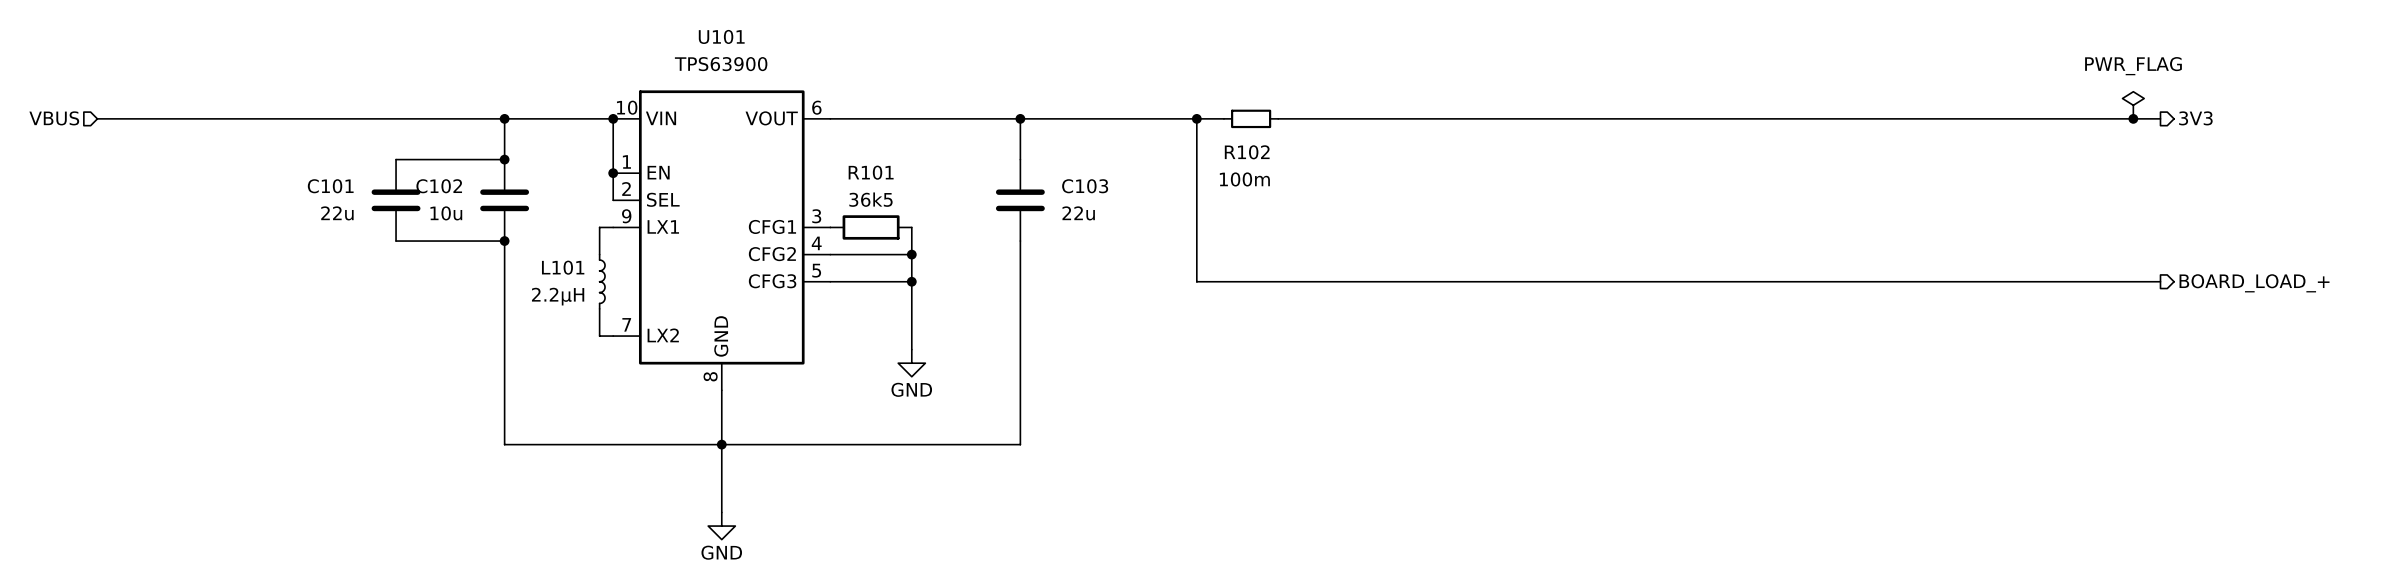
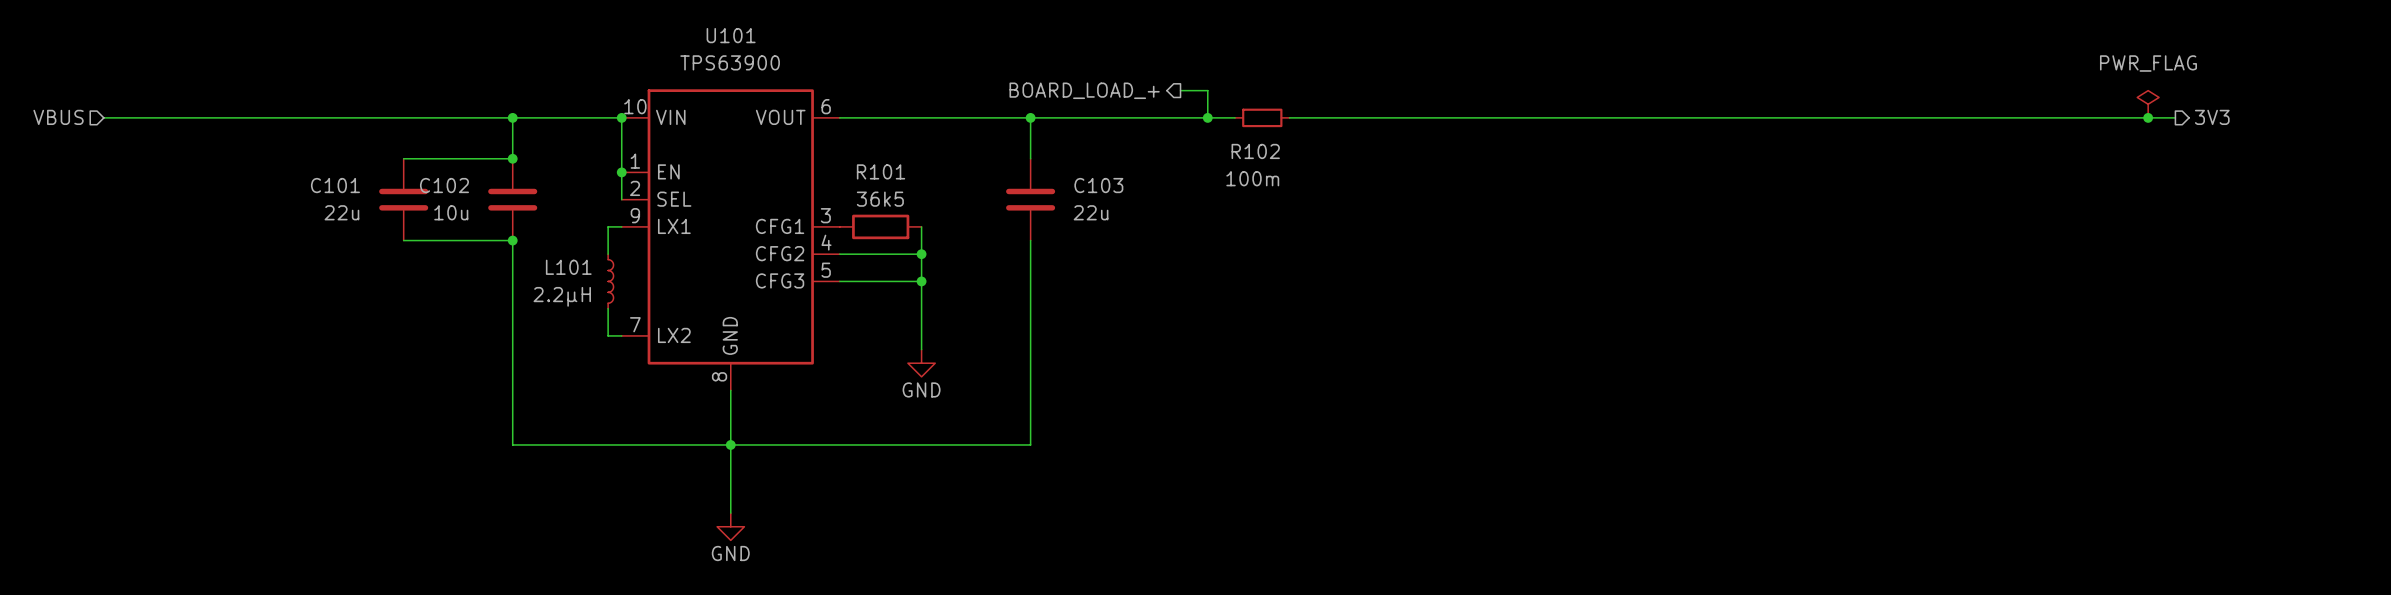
hierarchical label: none -> BOARD_LOAD_+ (1084, 90)
wire: (1196, 118) (1196, 281) (2160, 281) -> (1207, 117) (1207, 90) (1180, 90)
hierarchical label: BOARD_LOAD_+ (2254, 283) -> none

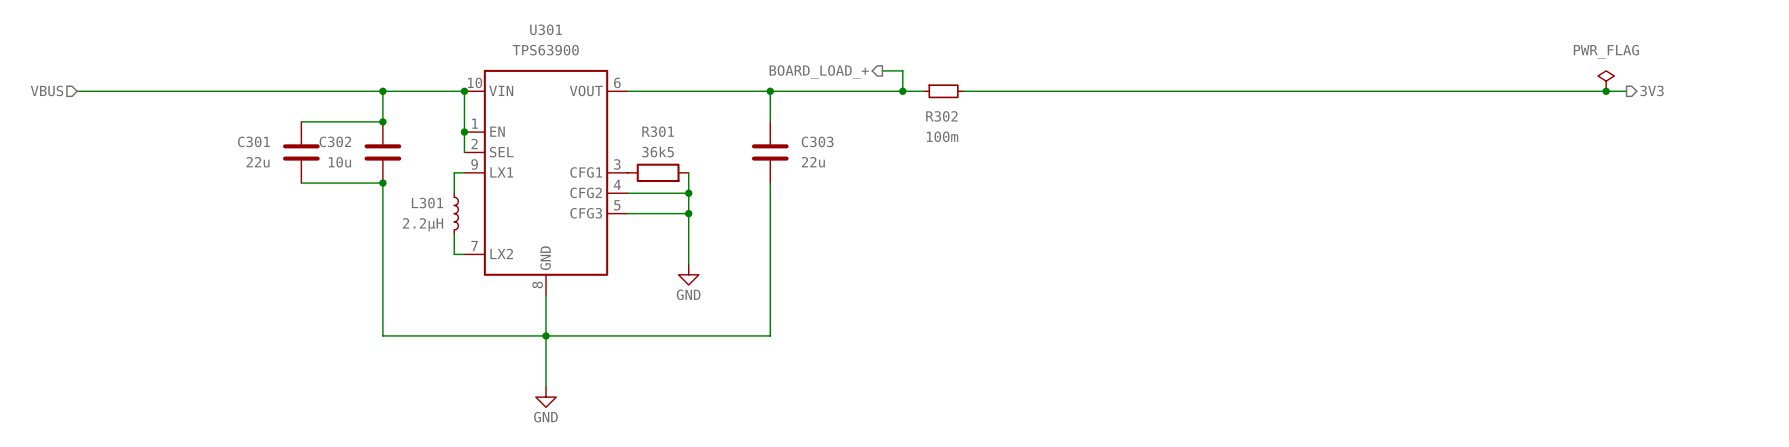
U101 name: U101 (731, 35) -> U301 (546, 29)
R102 name: R102 (1255, 151) -> R302 (941, 116)
R101 name: R101 (881, 171) -> R301 (658, 131)
C101 name: C101 (335, 185) -> C301 (253, 141)
C102 name: C102 (444, 185) -> C302 (335, 141)
C103 name: C103 (1098, 185) -> C303 (817, 141)
L101 name: L101 (568, 267) -> L301 (427, 203)

